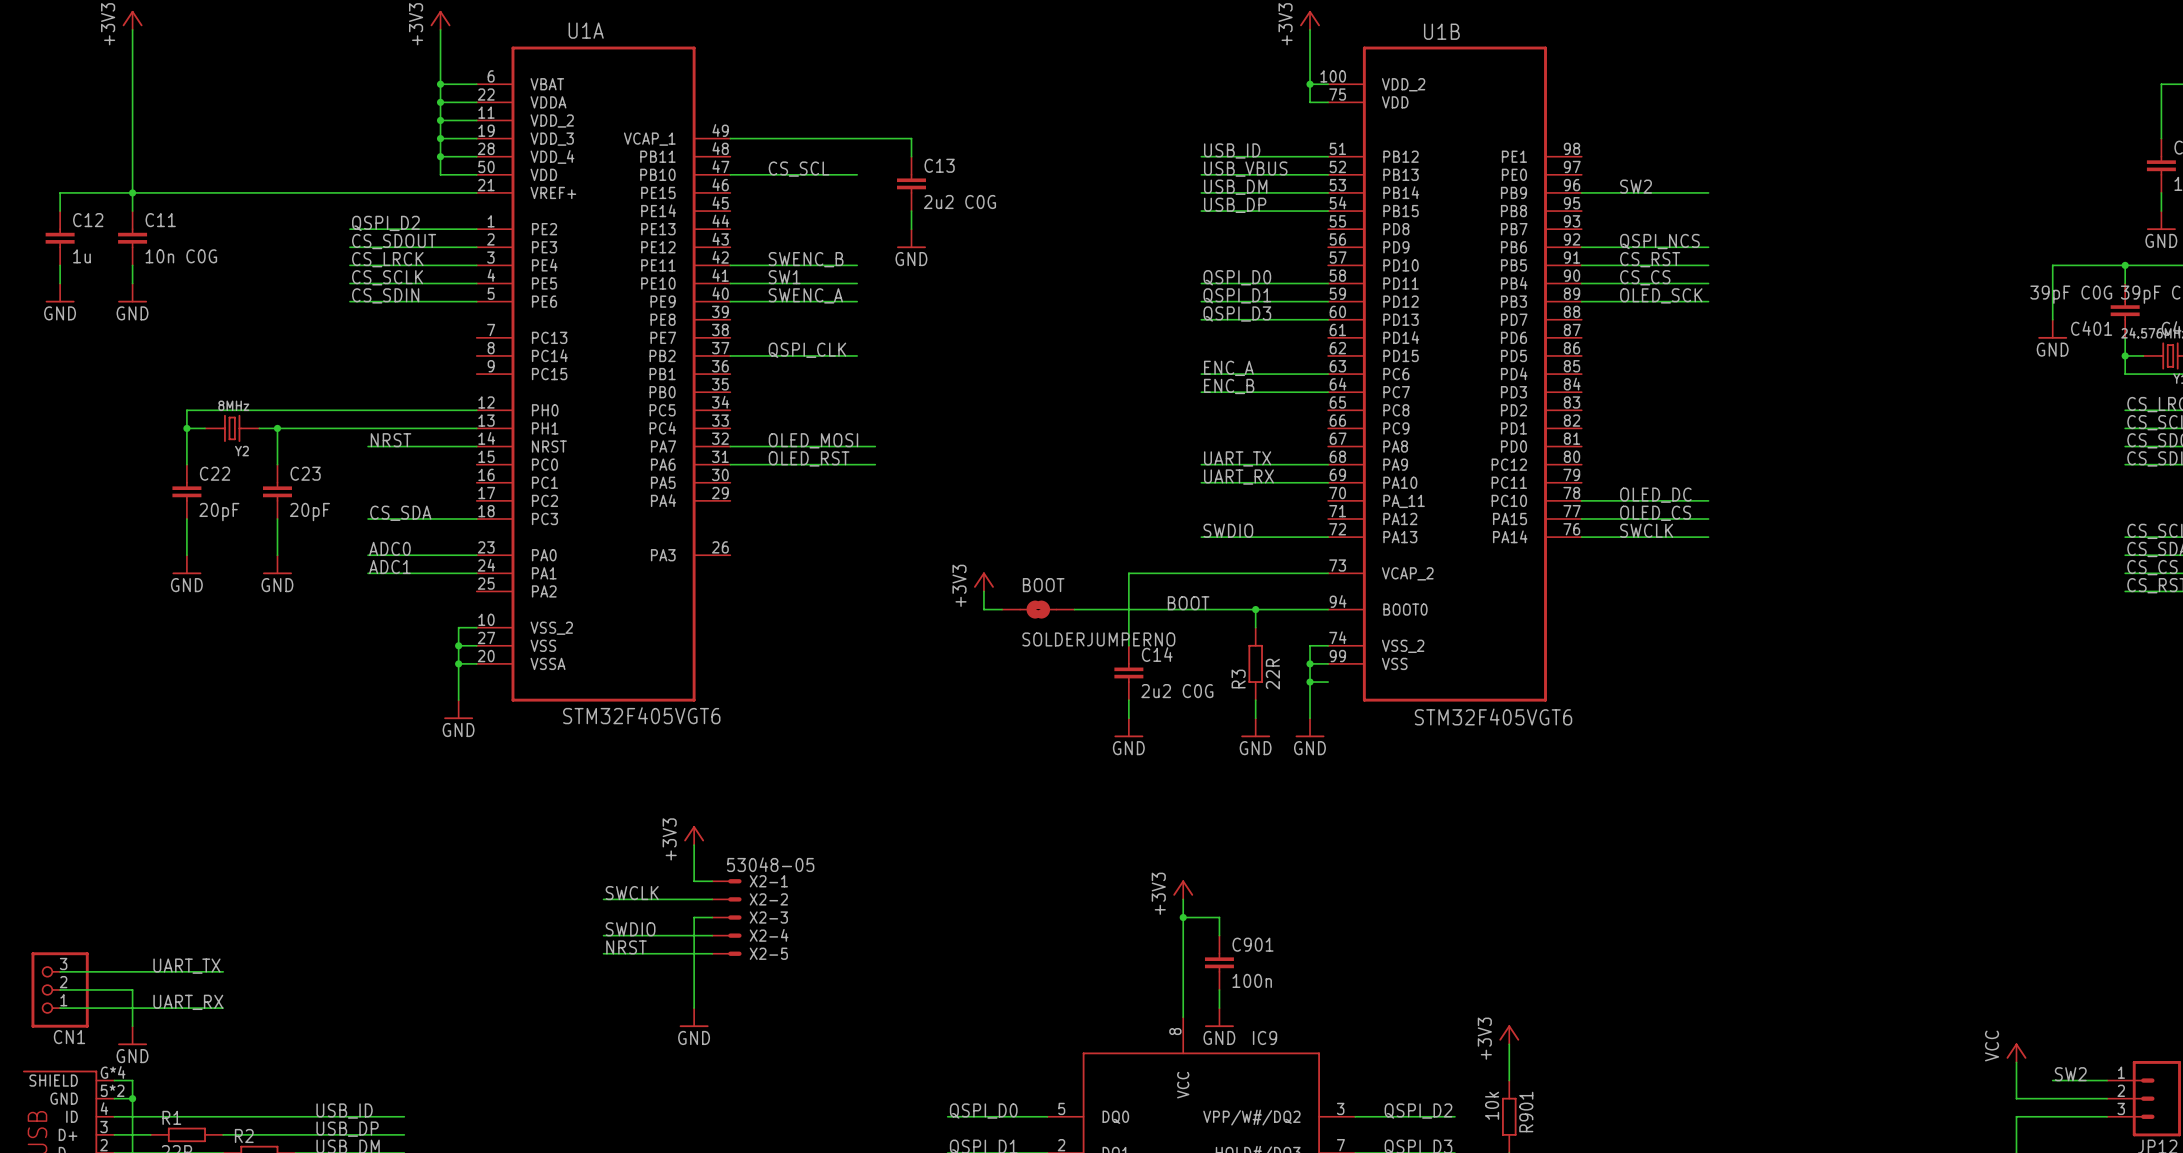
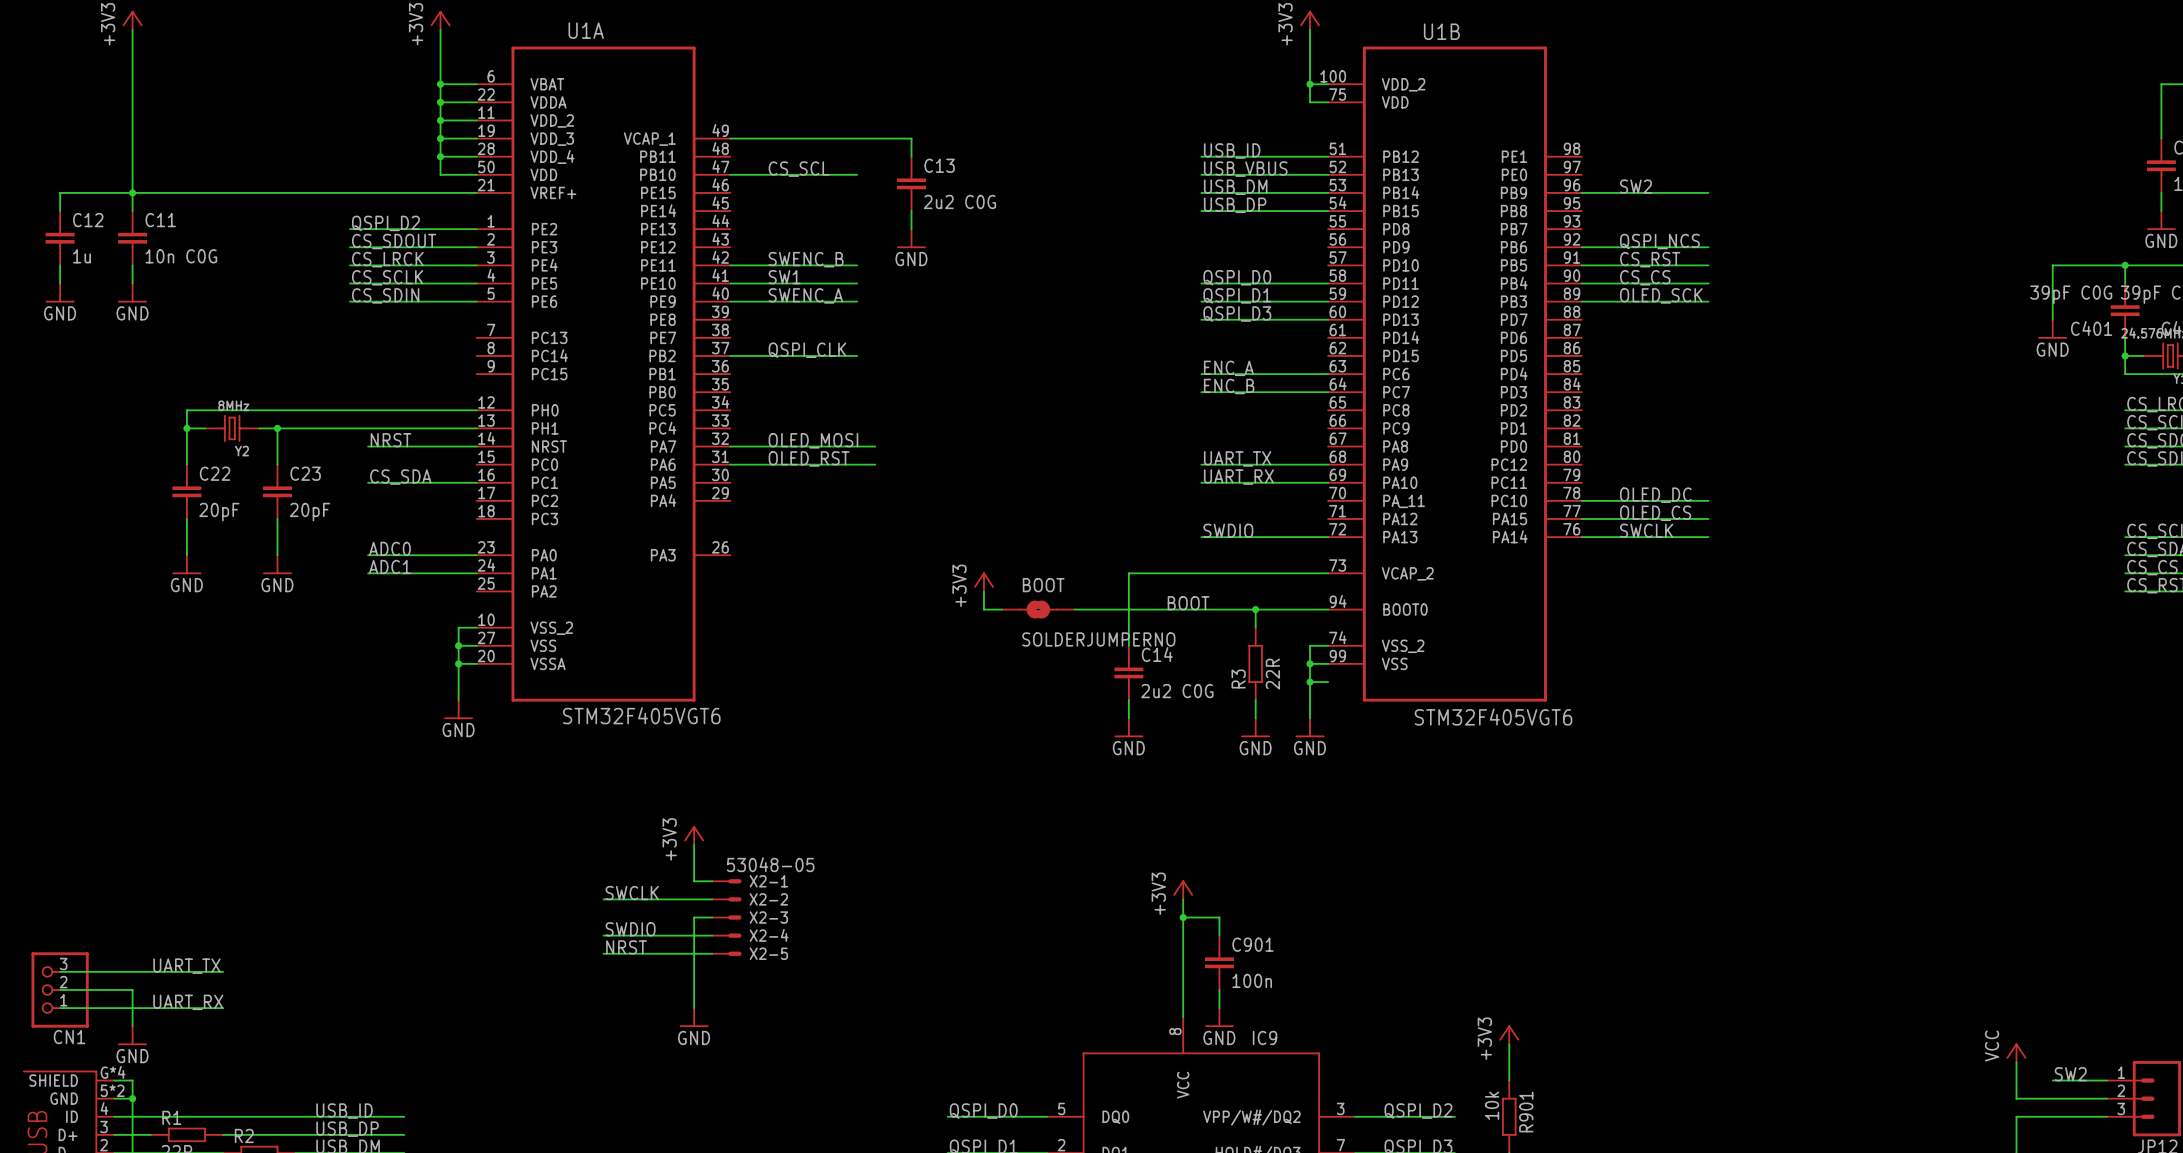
label position: CS_SDA (400, 513) -> CS_SDA (400, 477)
wire: (368, 518) (476, 518) -> (368, 482) (476, 482)

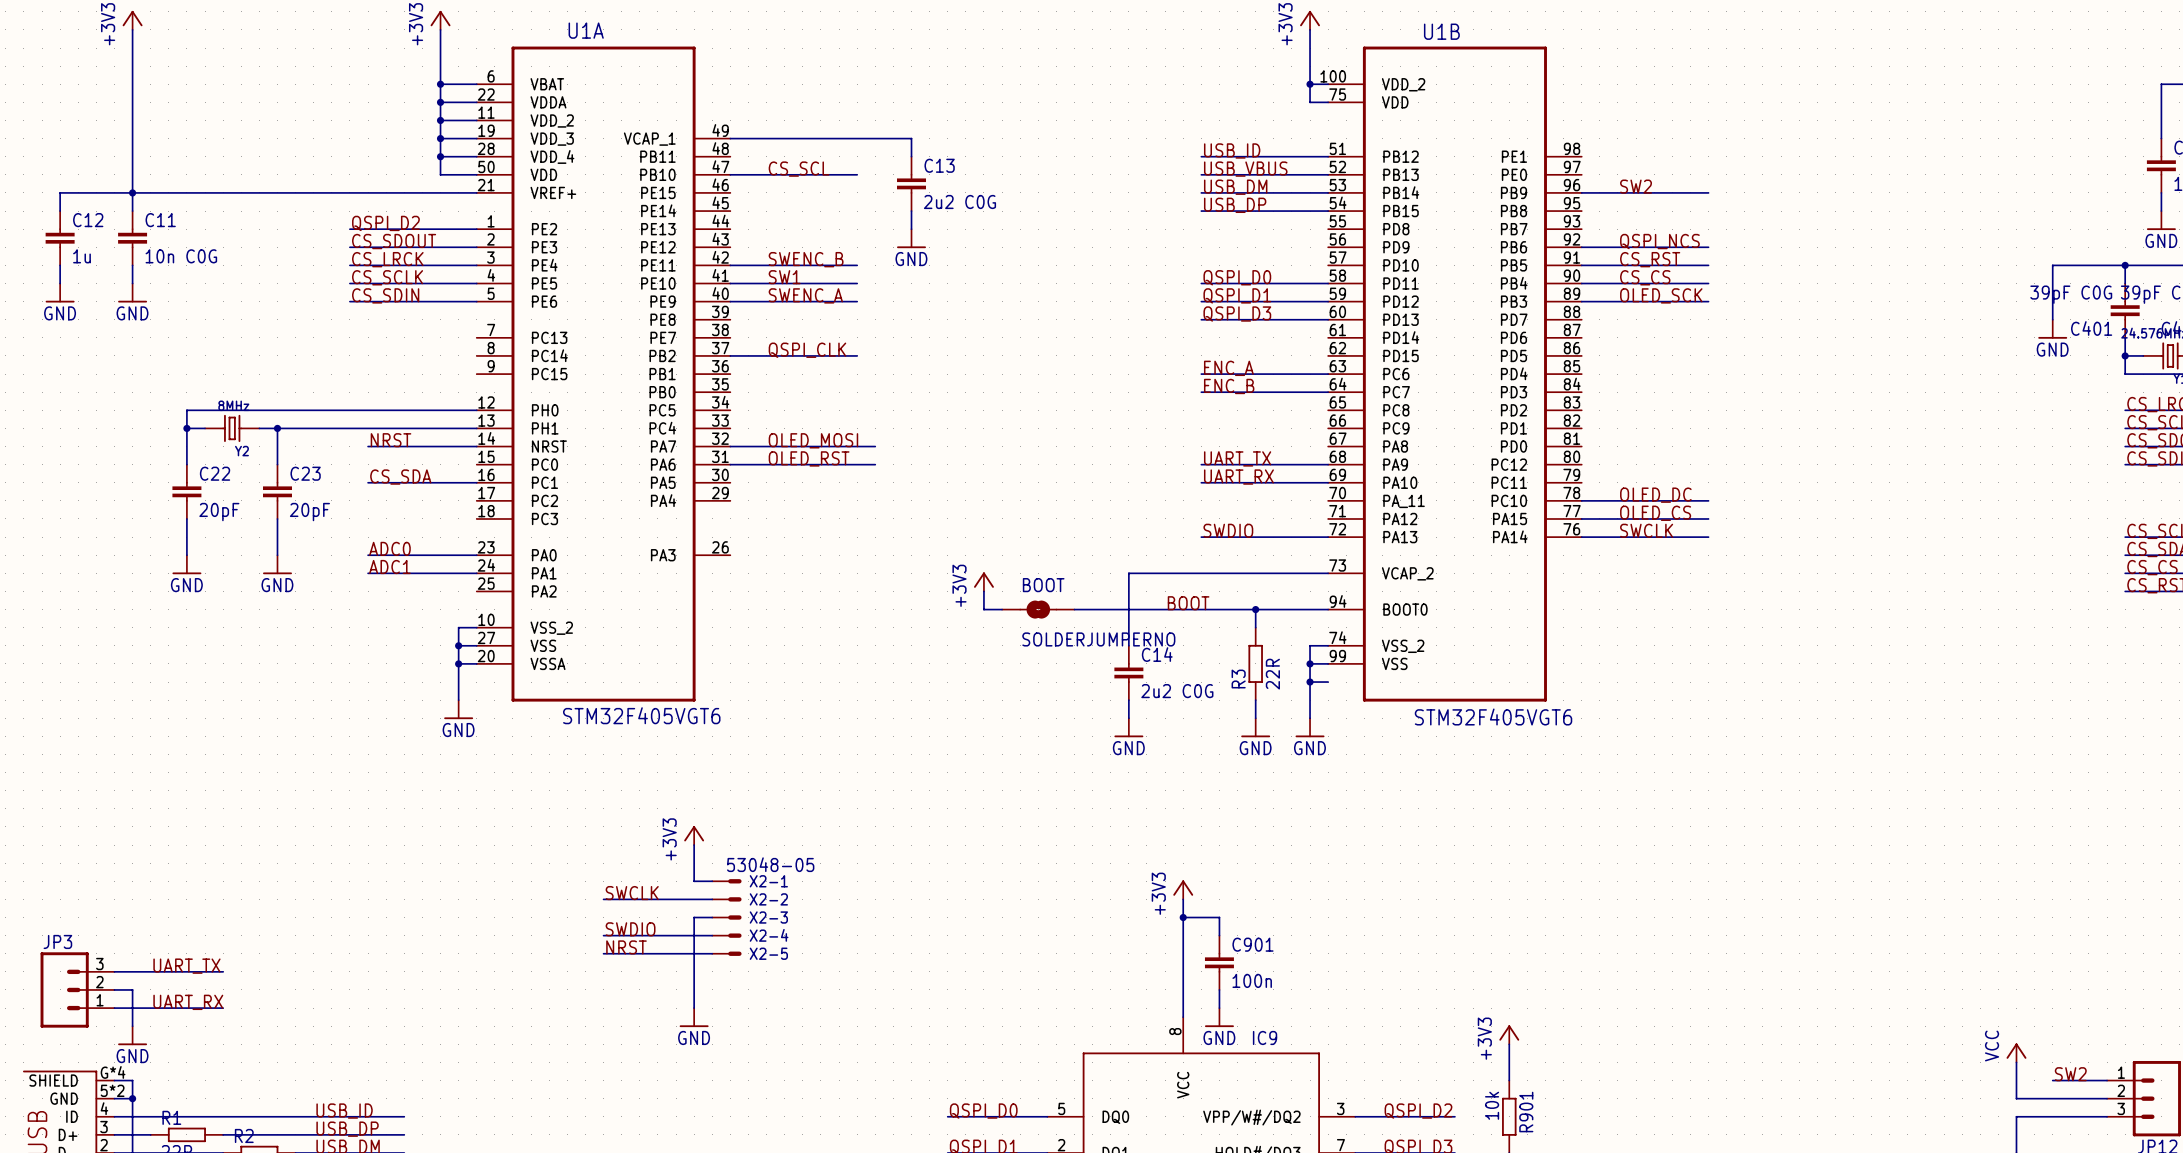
CN1: (60, 989) -> none
JP3: none -> (77, 989)

